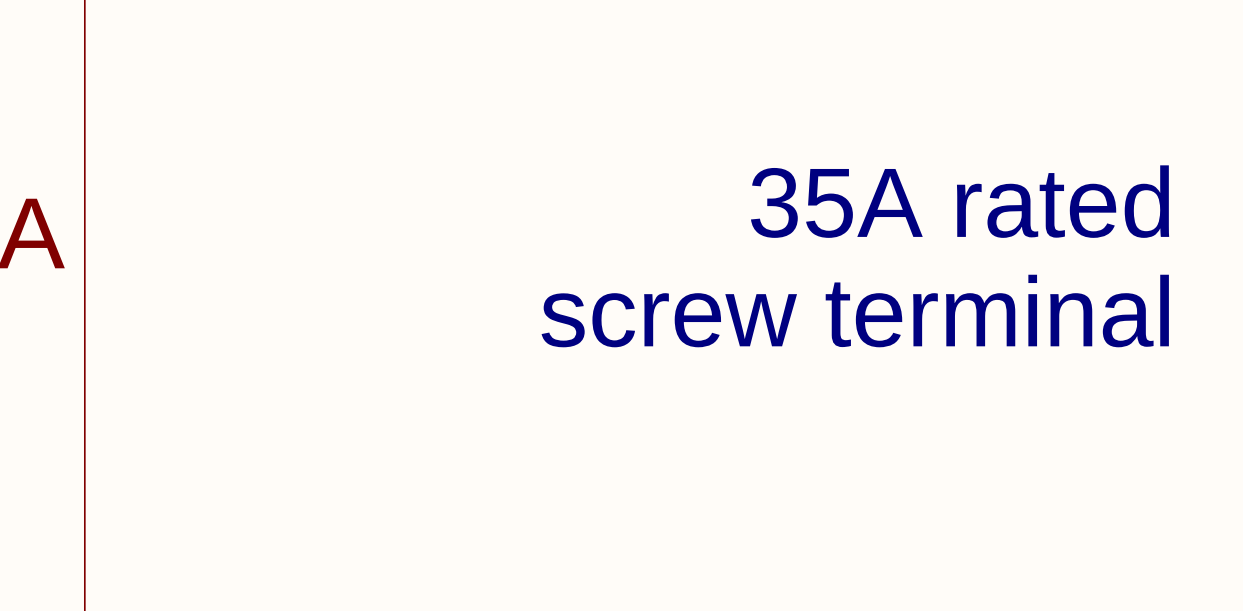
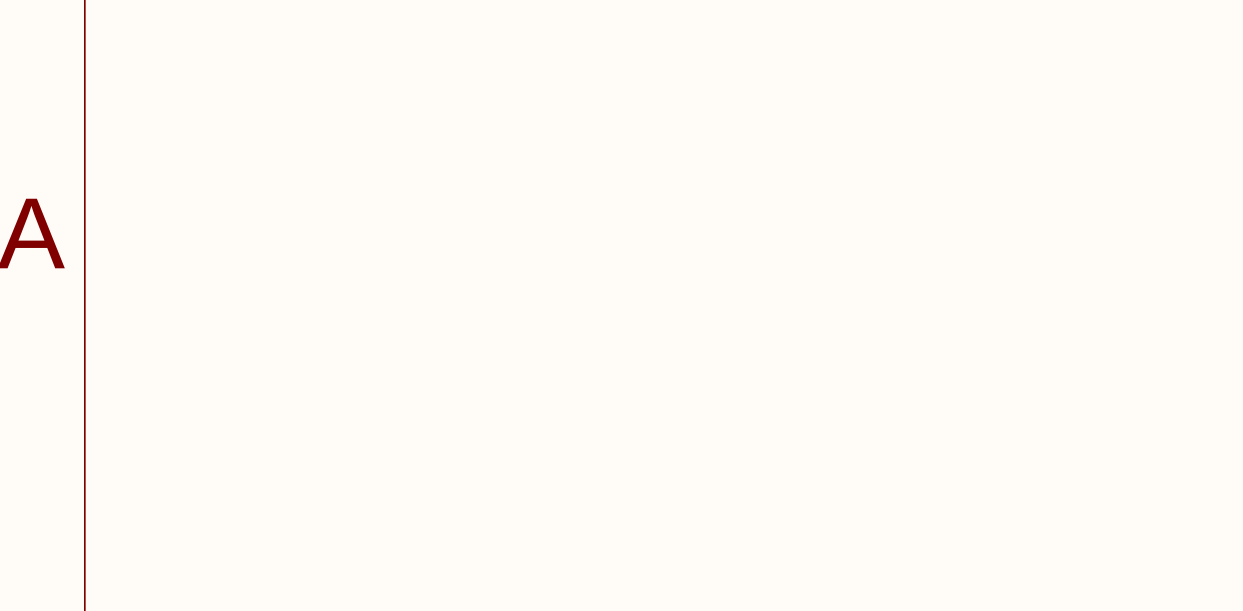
text: 35A rated (960, 201) -> none
text: screw terminal (855, 311) -> none

